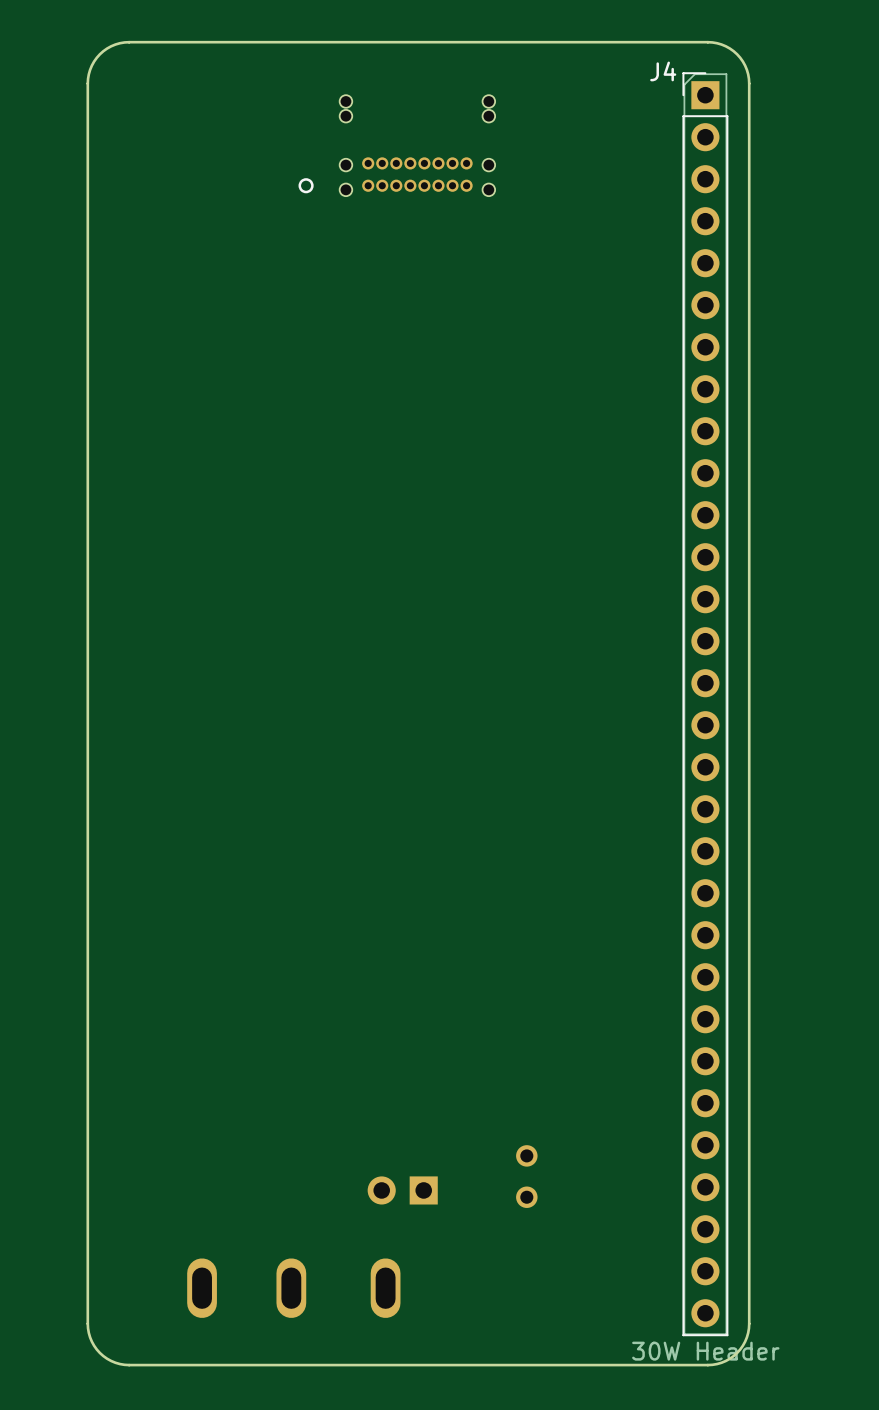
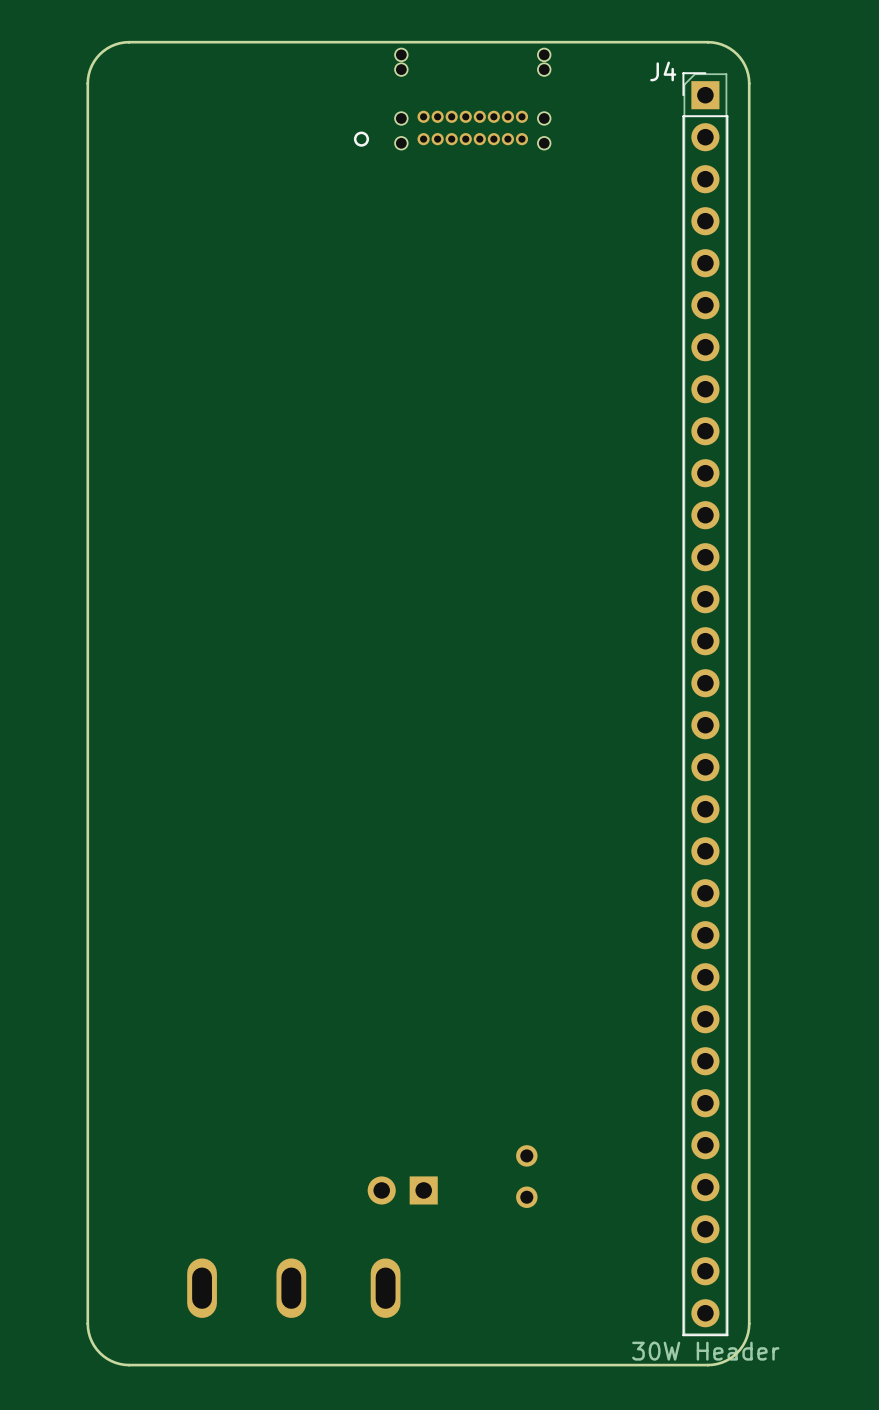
part position: (396, 145) -> (452, 99)

